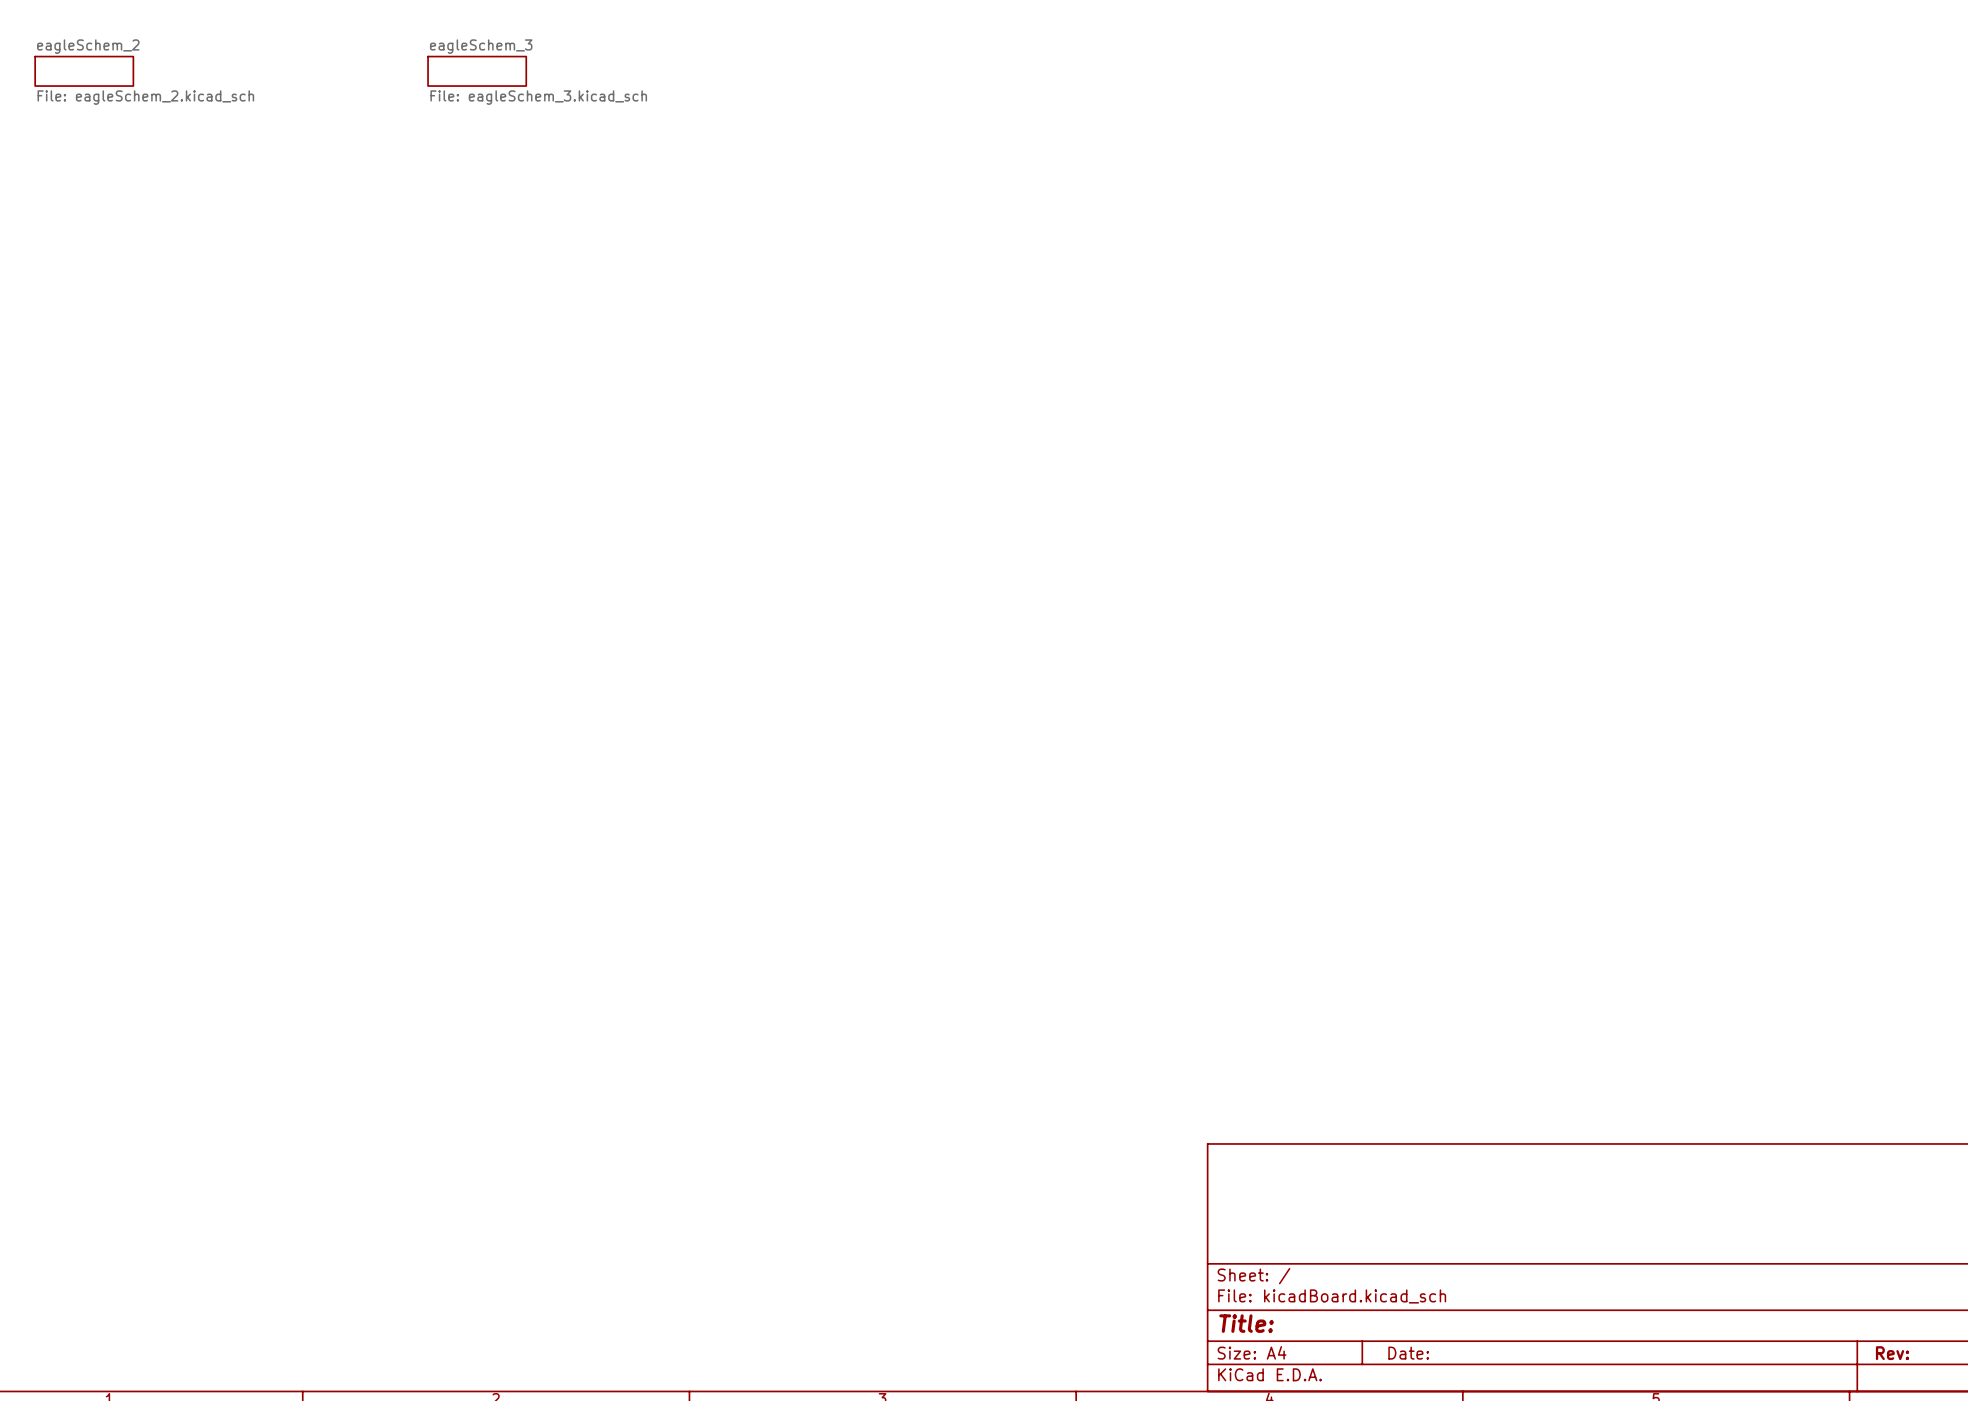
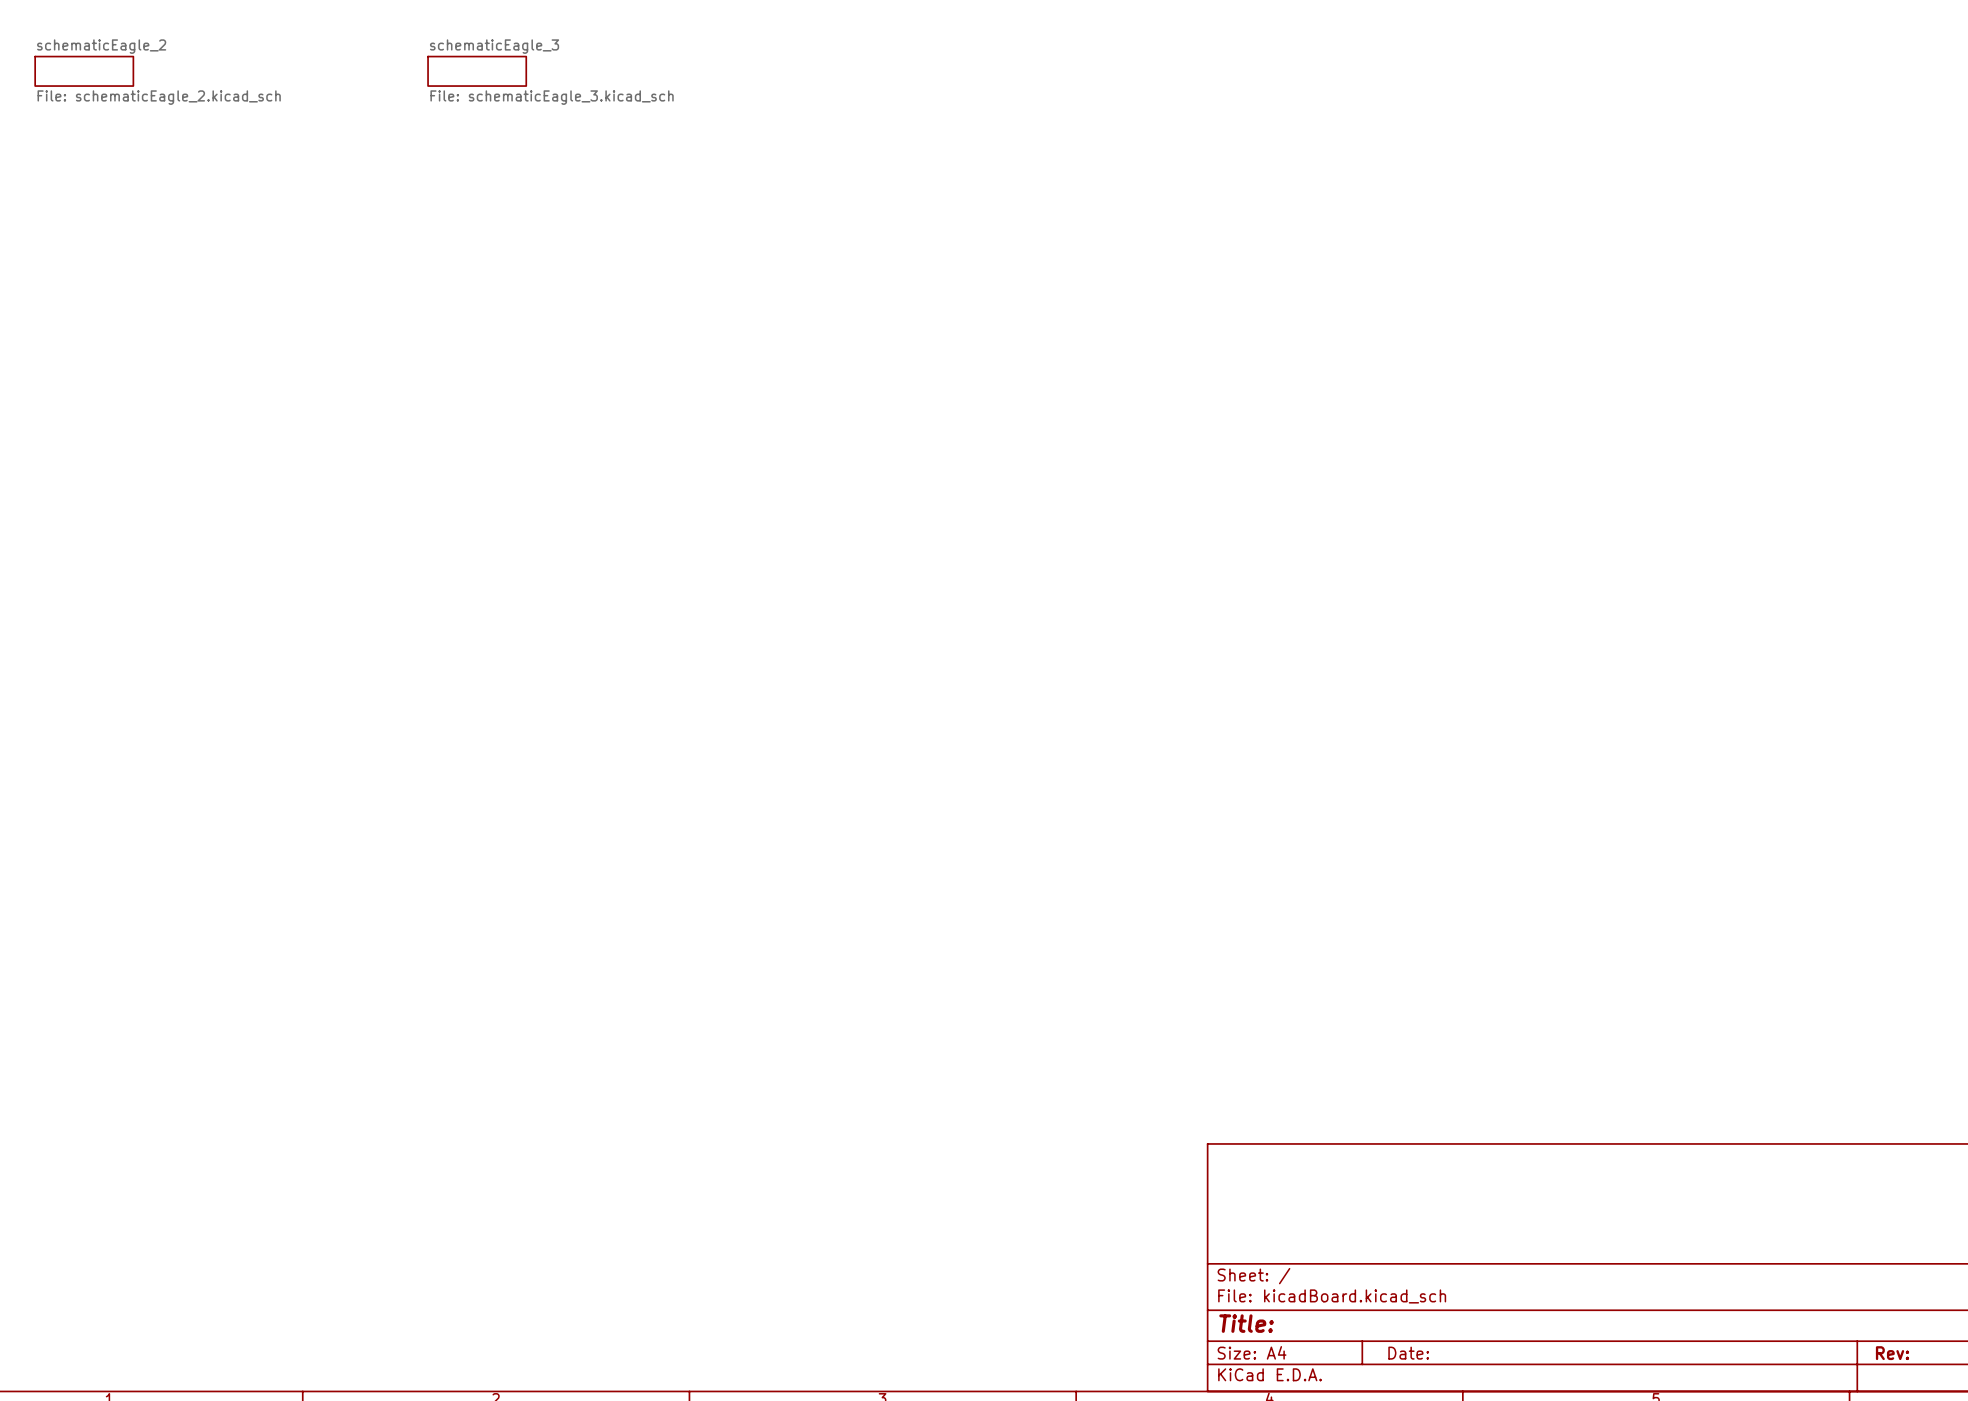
sheet eagleSchem_2 name: eagleSchem_2 (88, 46) -> schematicEagle_2 (101, 46)
sheet eagleSchem_3 name: eagleSchem_3 (481, 46) -> schematicEagle_3 (494, 46)
sheet eagleSchem_2 value: File: eagleSchem_2.kicad_sch (145, 97) -> File: schematicEagle_2.kicad_sch (159, 97)
sheet eagleSchem_3 value: File: eagleSchem_3.kicad_sch (538, 97) -> File: schematicEagle_3.kicad_sch (552, 97)

